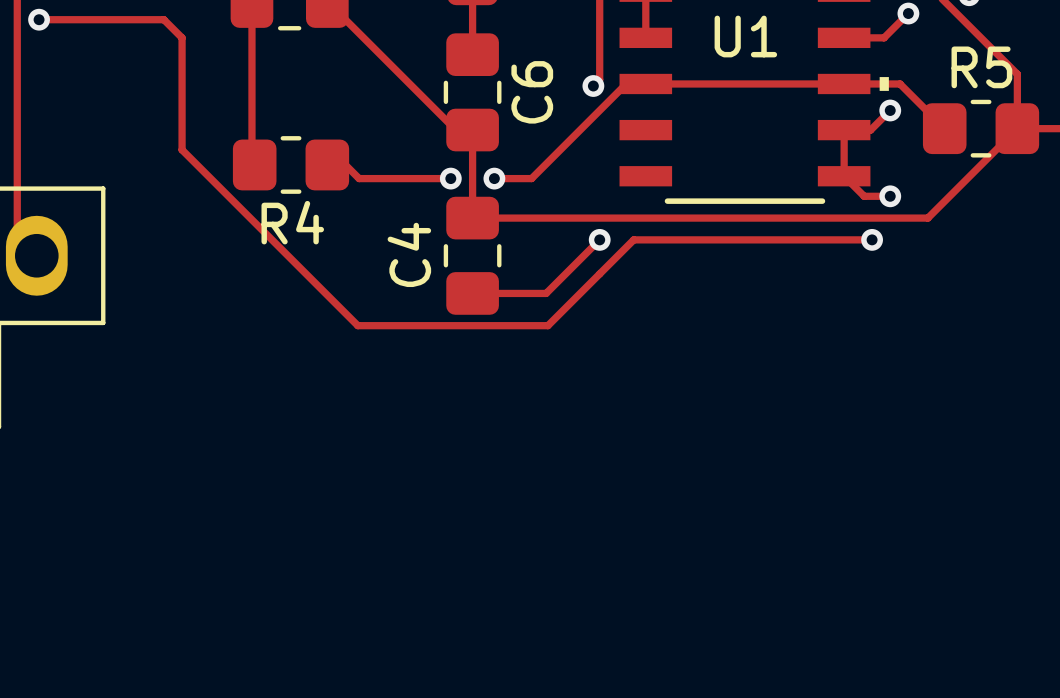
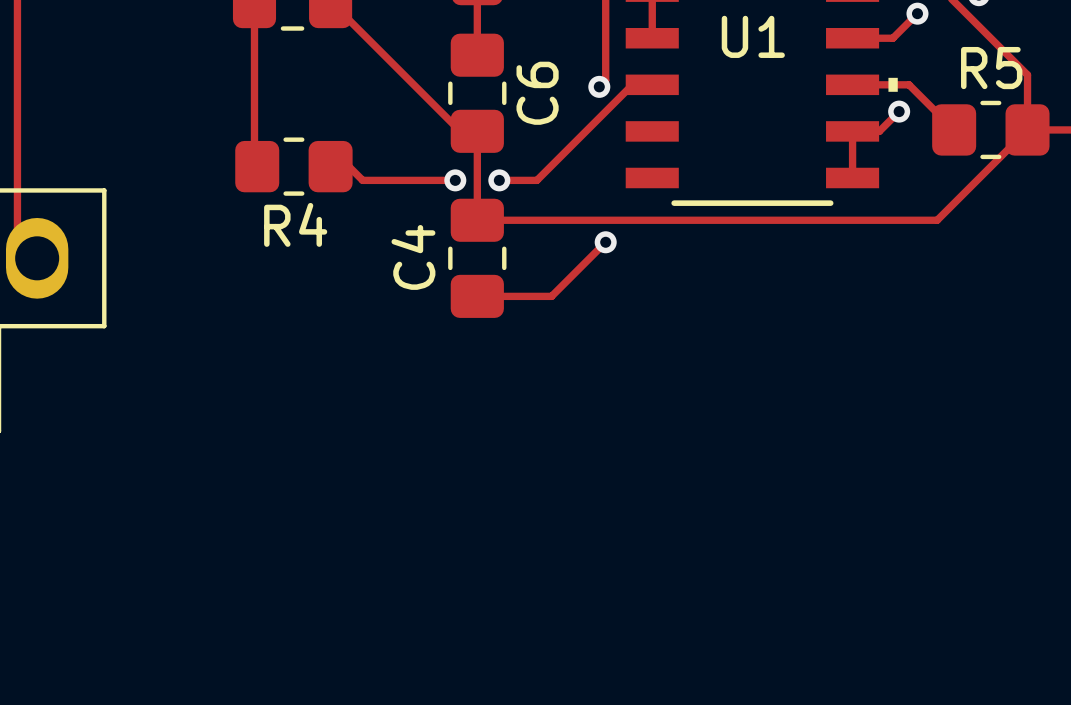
track: (39, 19) (163, 19) (182, 37) (182, 149) (357, 325) (547, 325) (633, 239) (872, 239) -> none
via: (39, 19) -> none
track: (645, 83) (844, 83) -> none
track: (844, 176) (864, 196) (890, 196) -> none
via: (890, 196) -> none
via: (872, 239) -> none

